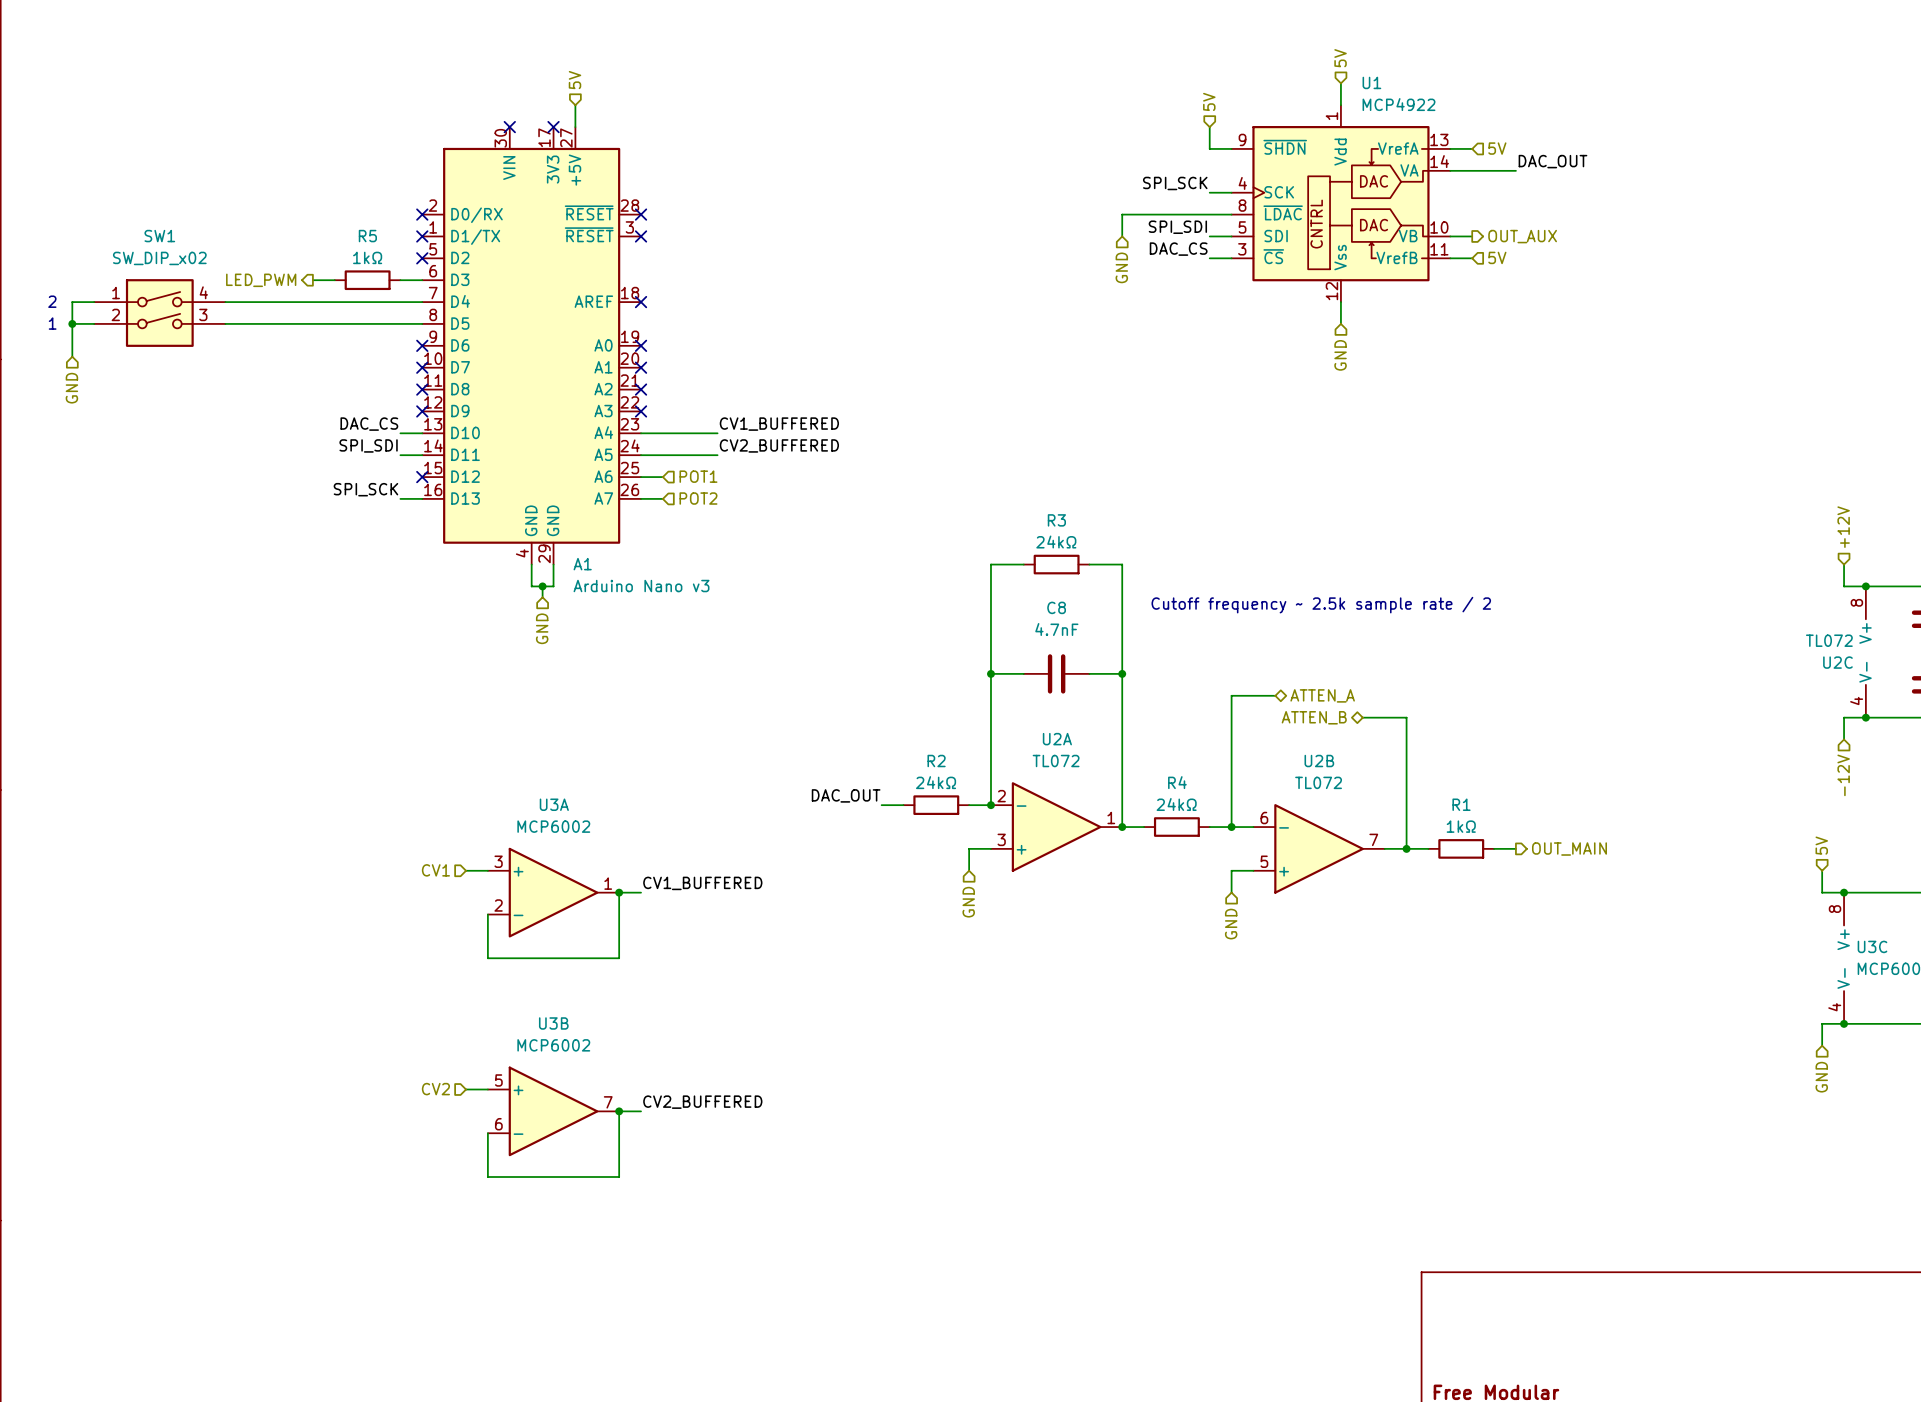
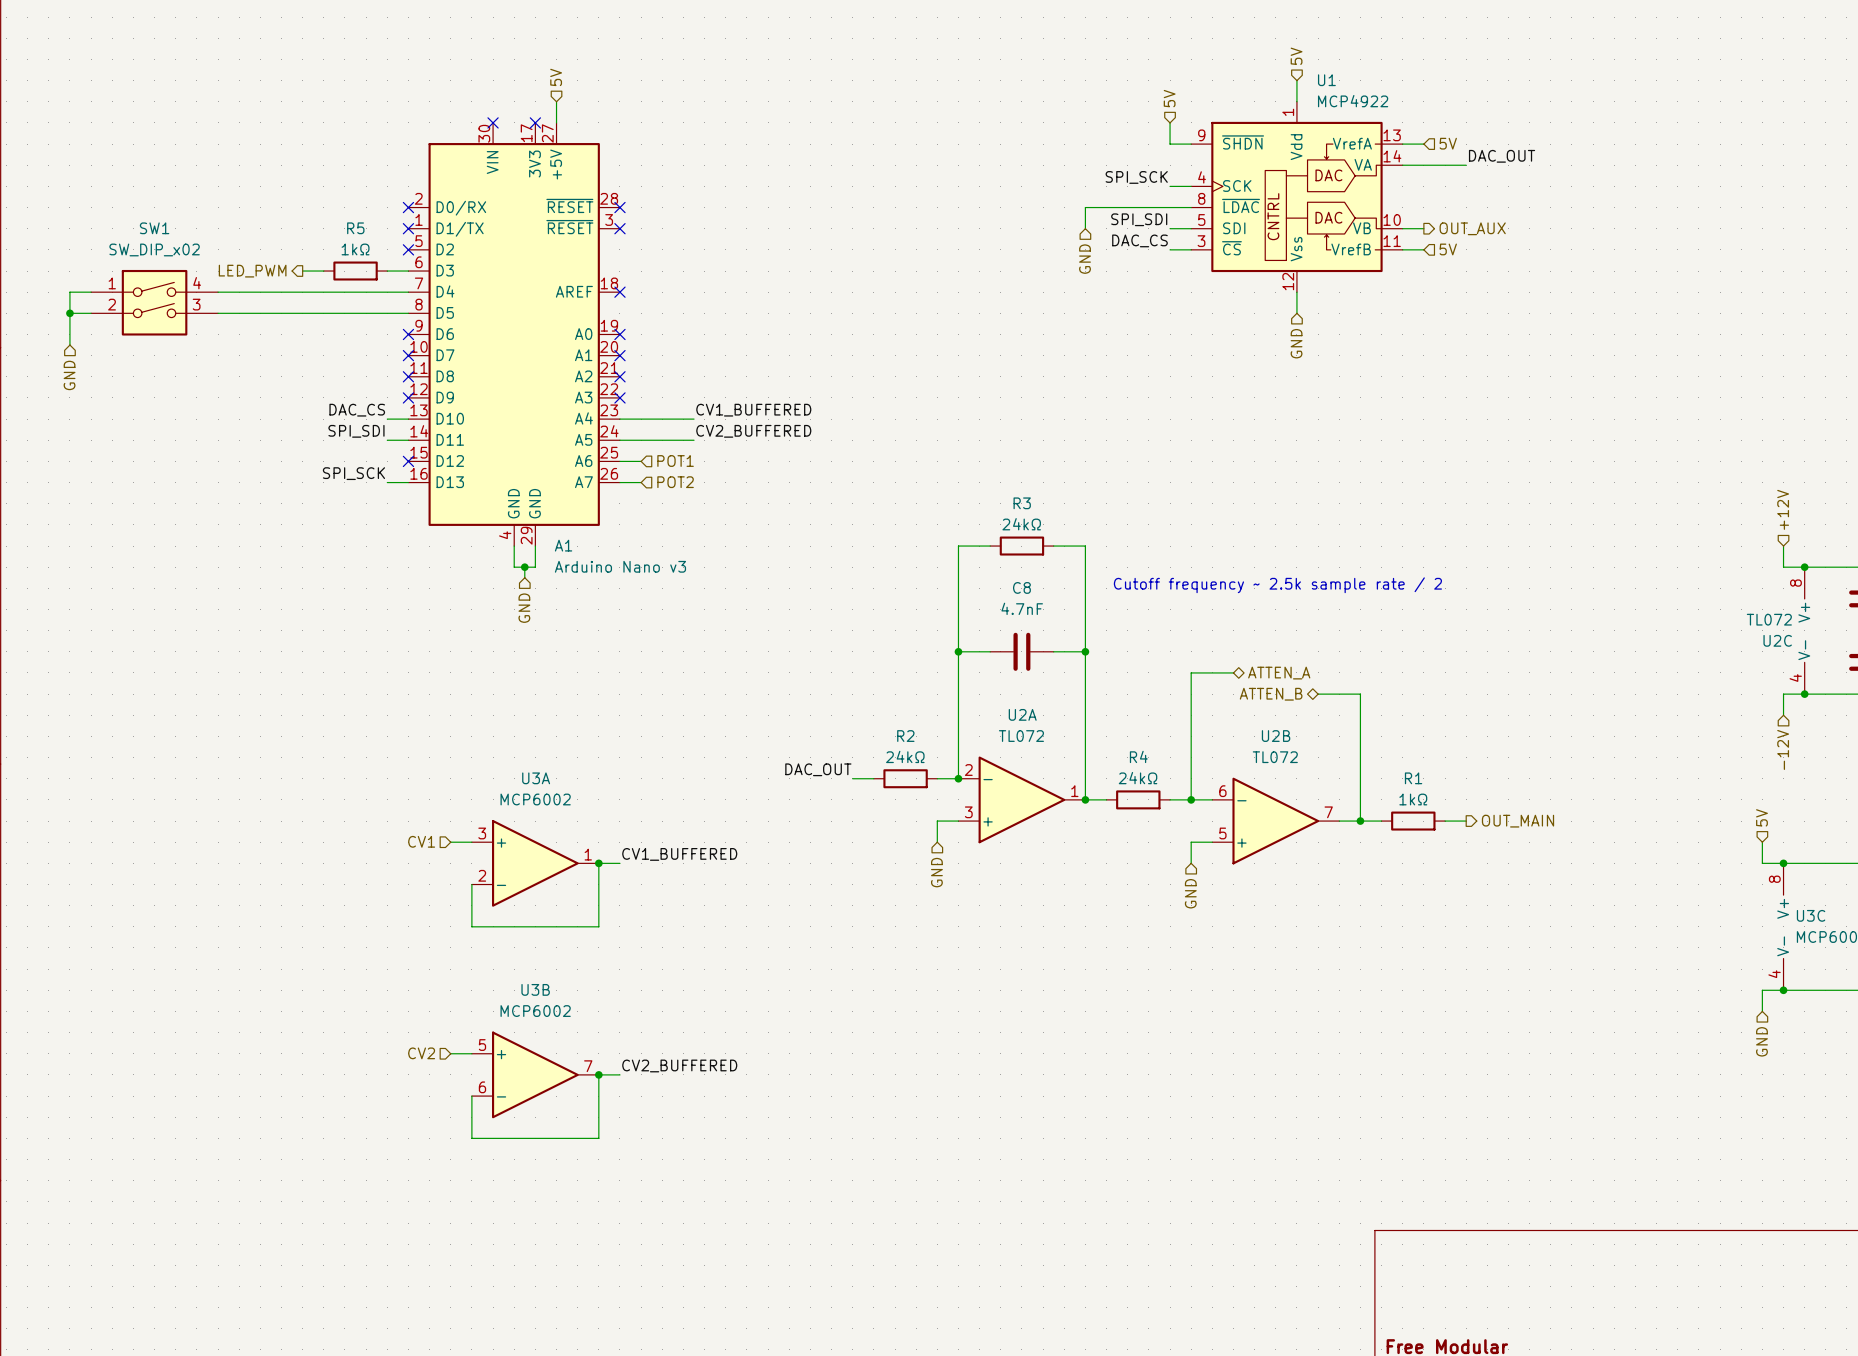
text: 2 (52, 301) -> none
text: 1 (52, 323) -> none

